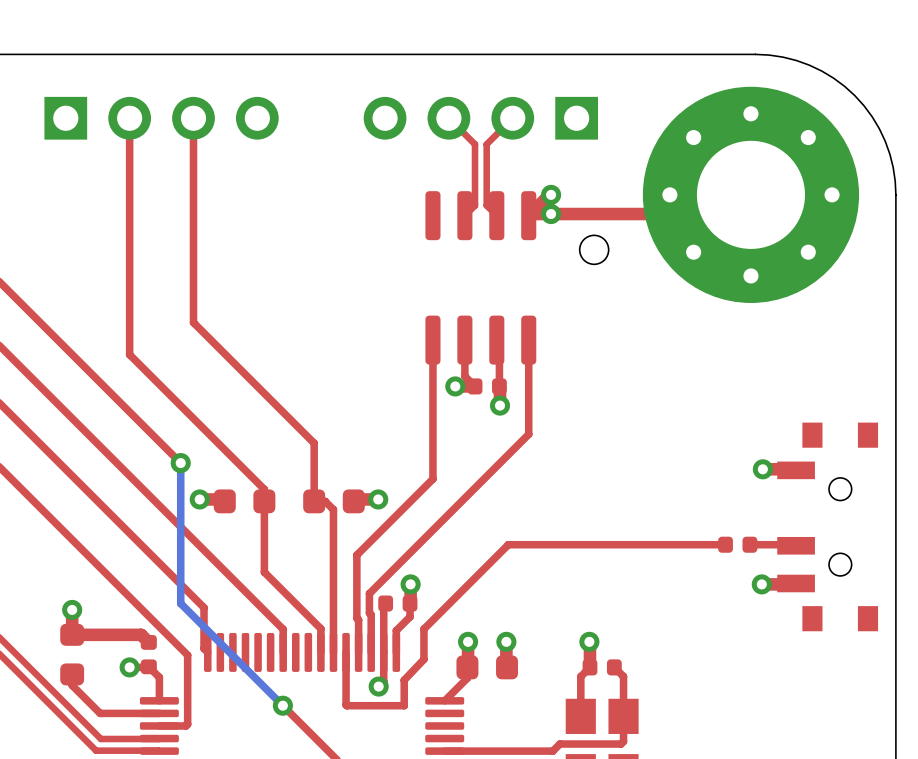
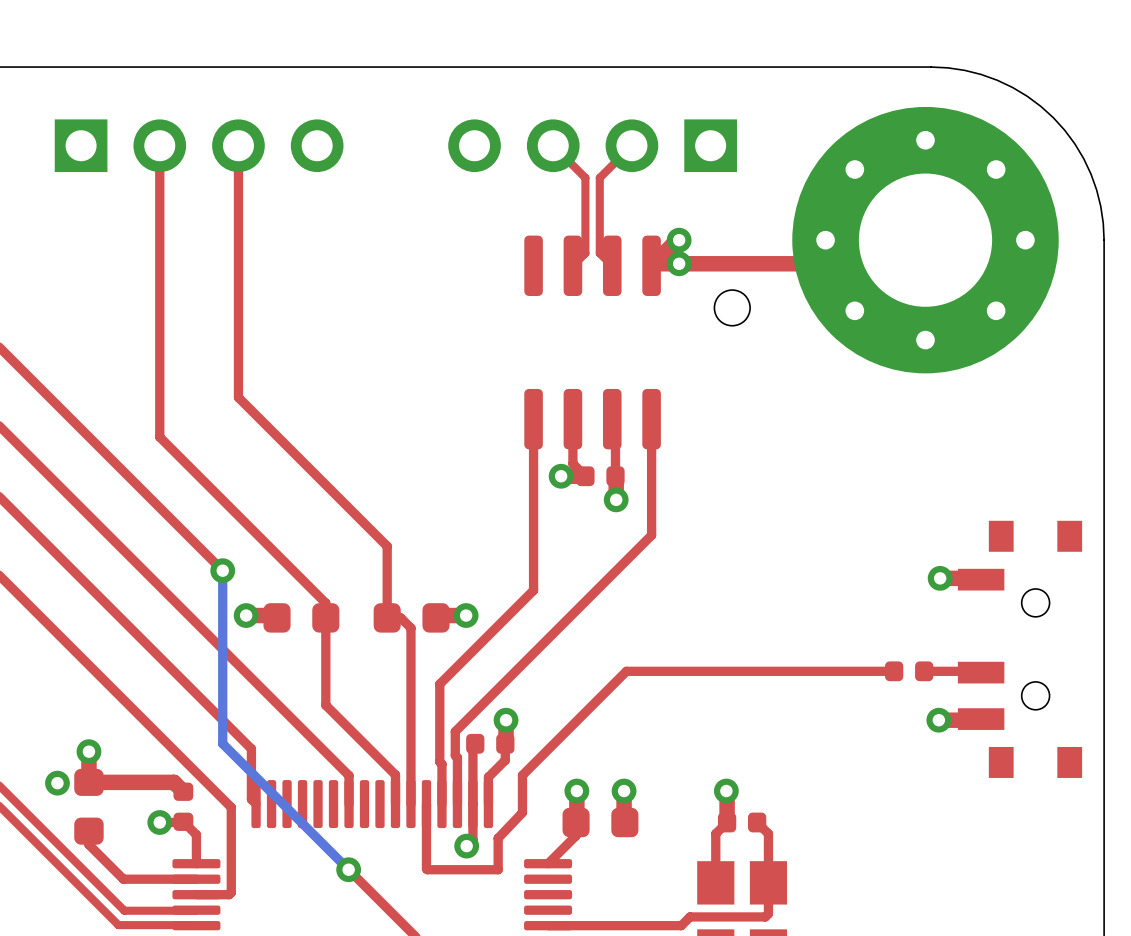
via: none -> (57, 783)

